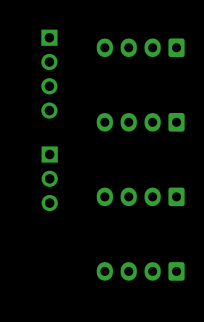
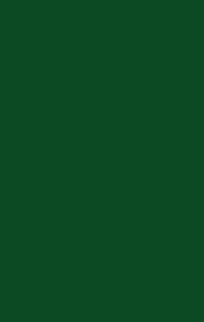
part: (140, 47) -> none
part: (49, 74) -> none
part: (140, 122) -> none
part: (49, 178) -> none
part: (140, 196) -> none
part: (140, 271) -> none

